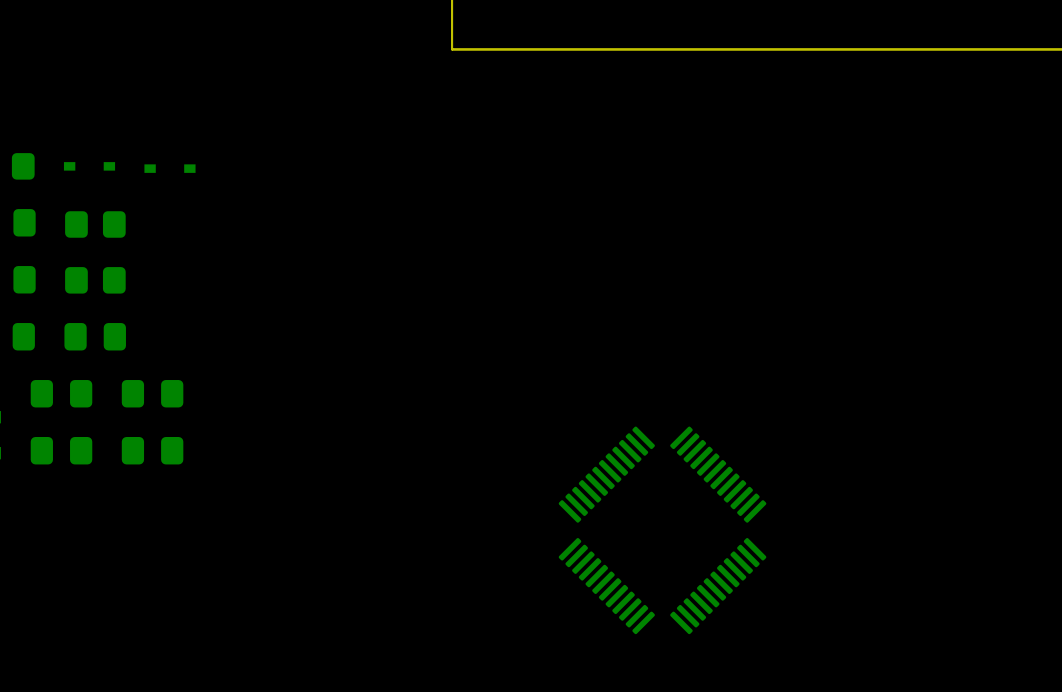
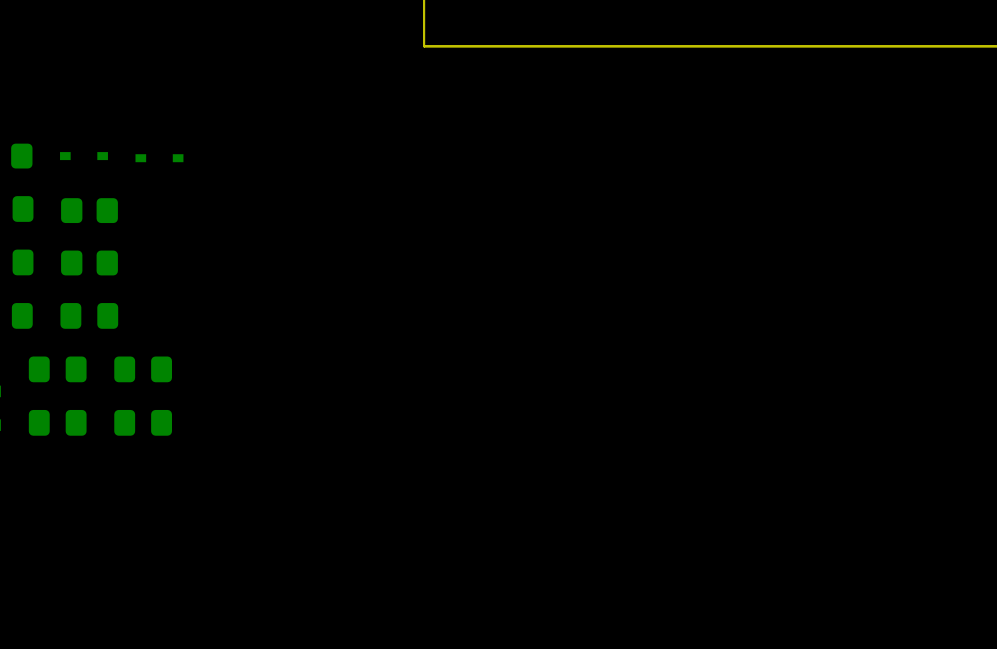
part: (662, 530) -> none

